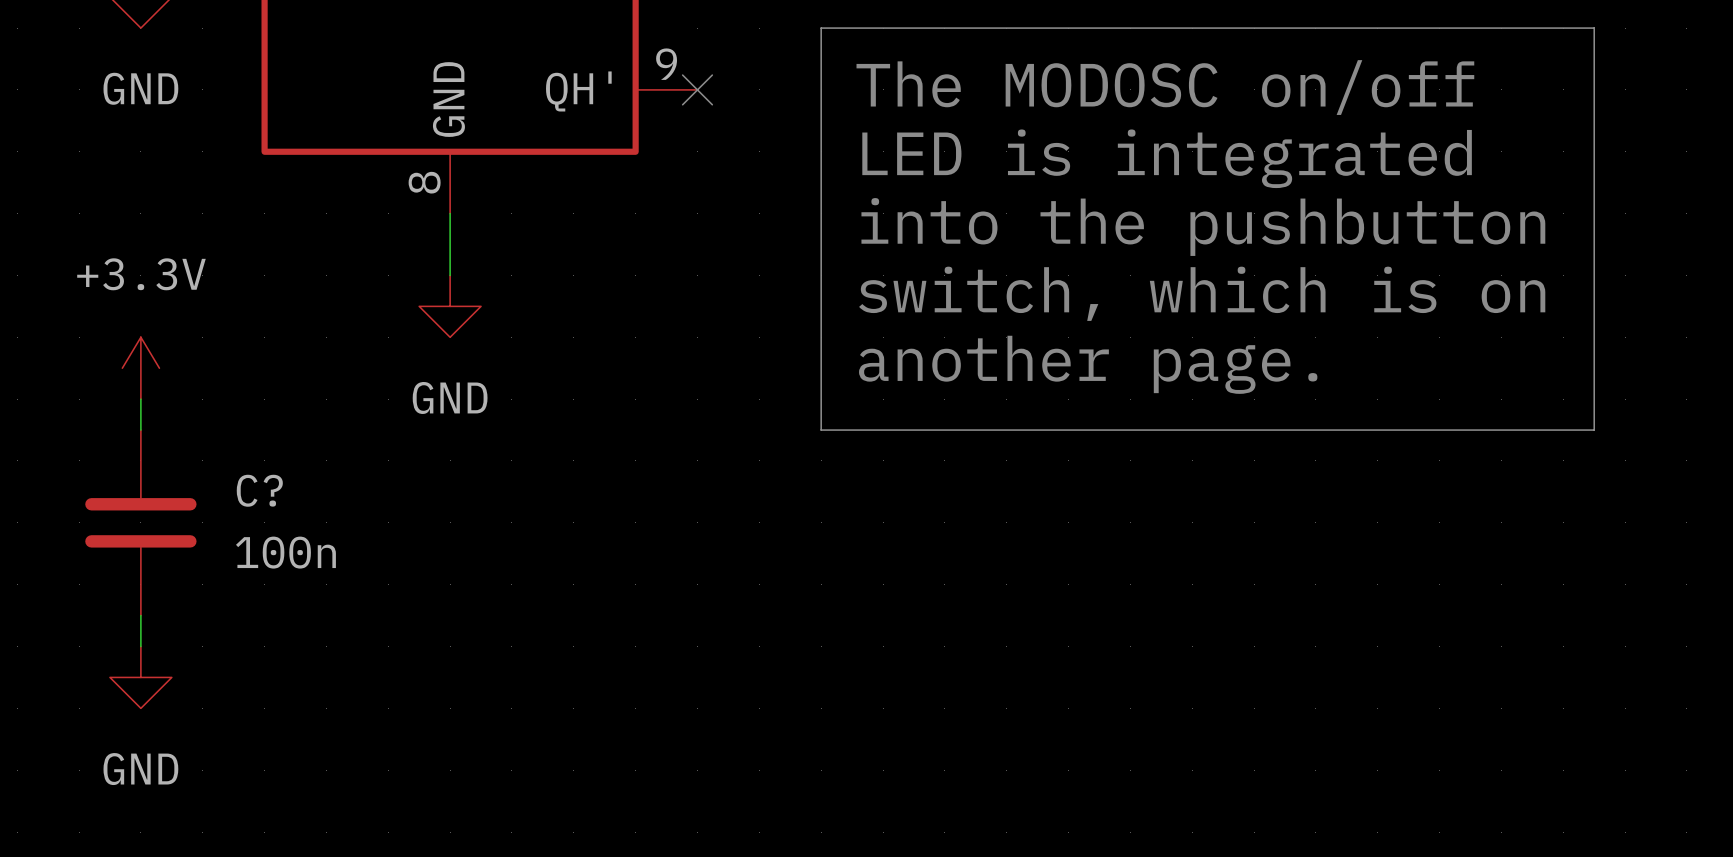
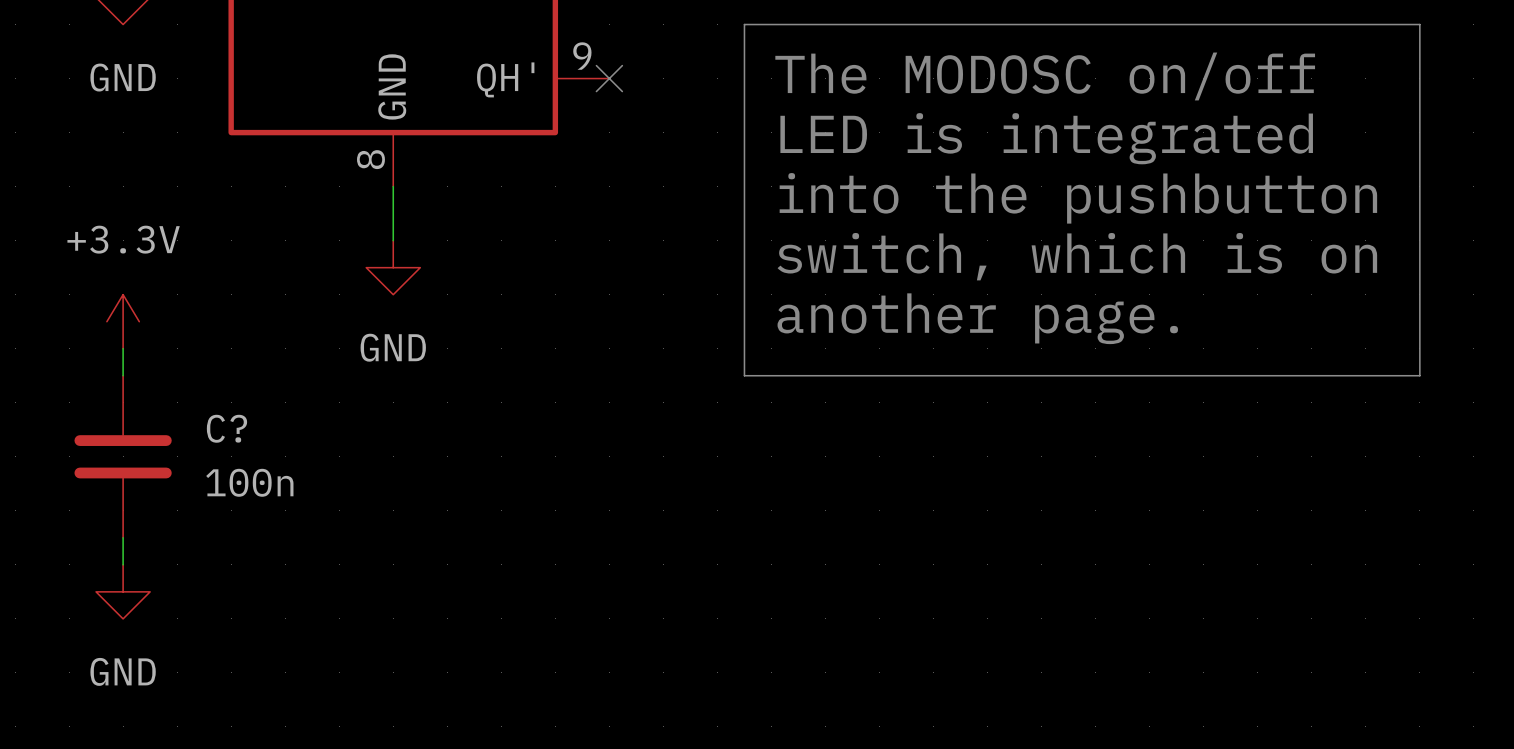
line: (852, 28) (821, 28) (821, 430) (852, 430) -> (744, 24) (744, 375)
line: (1594, 28) (1594, 430) -> (1392, 24) (1419, 24) (1419, 375) (1392, 375)
text position: The MODOSC on/off (1165, 87) -> The MODOSC on/off (1045, 76)
text position: LED is integrated (1167, 158) -> LED is integrated (1046, 138)
text position: into the pushbutton (1203, 227) -> into the pushbutton (1078, 198)
text position: switch, which is on (1202, 293) -> switch, which is on (1077, 256)
text position: another page. (1088, 364) -> another page. (977, 318)

